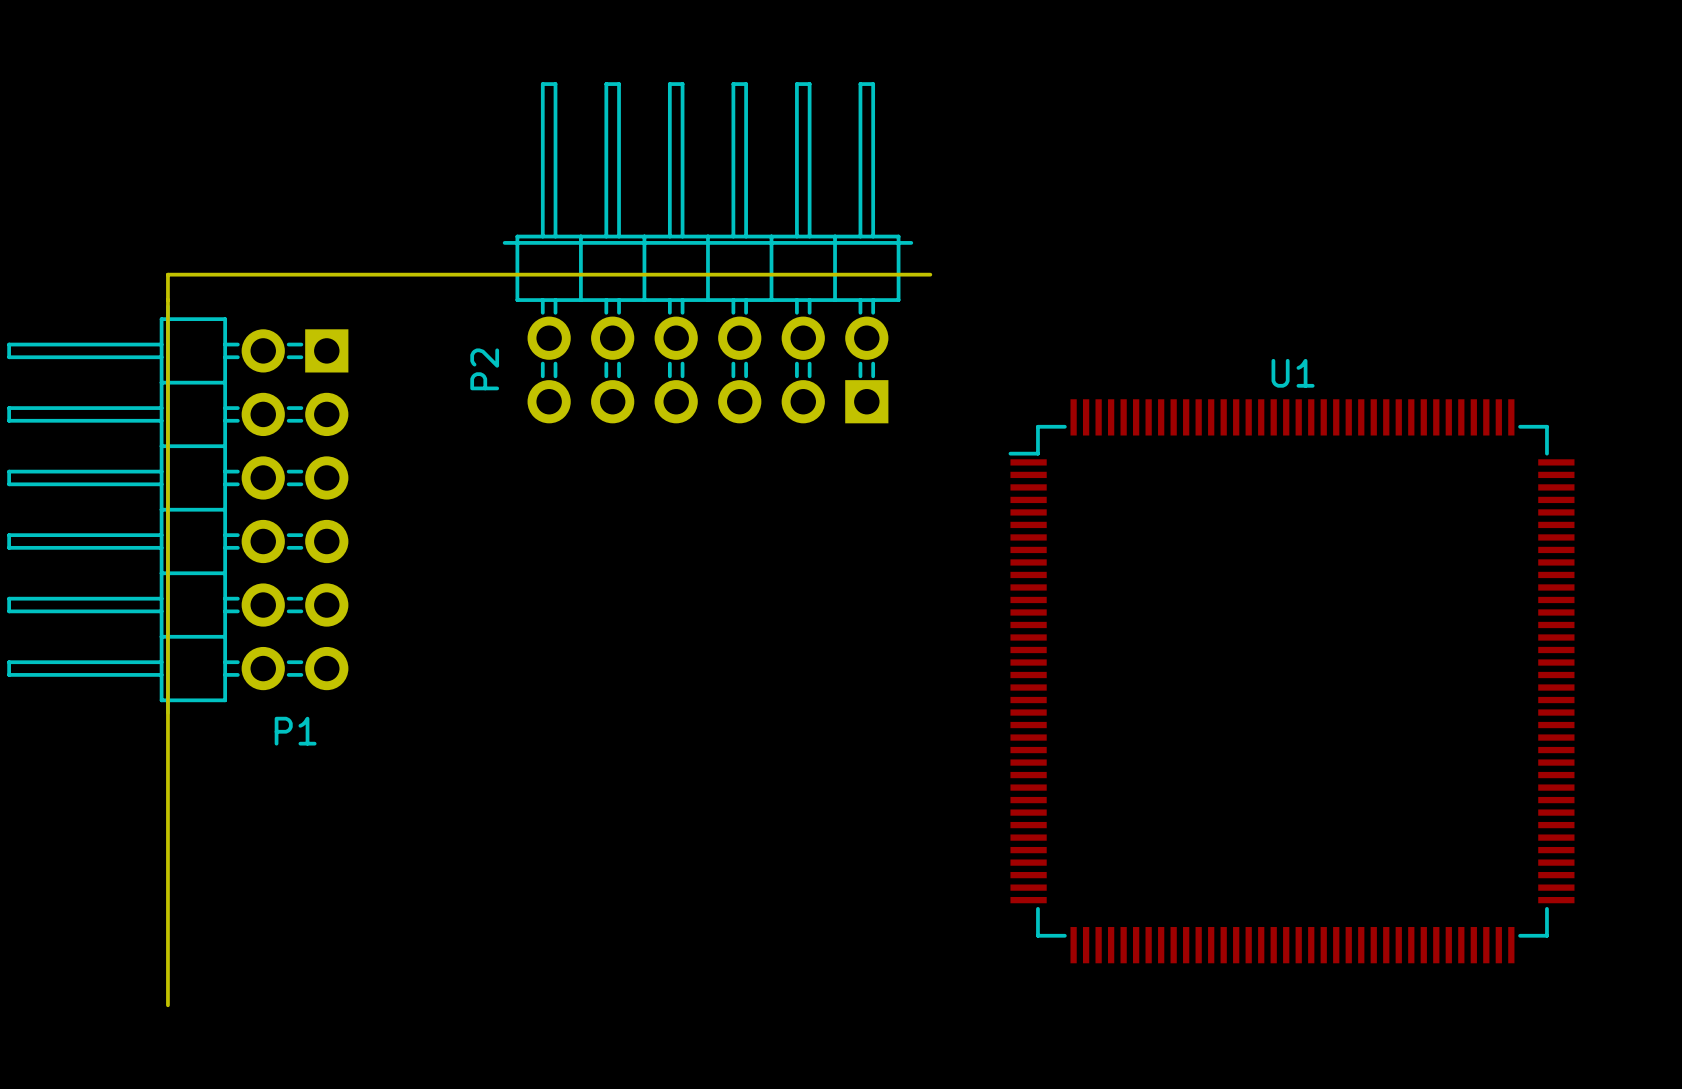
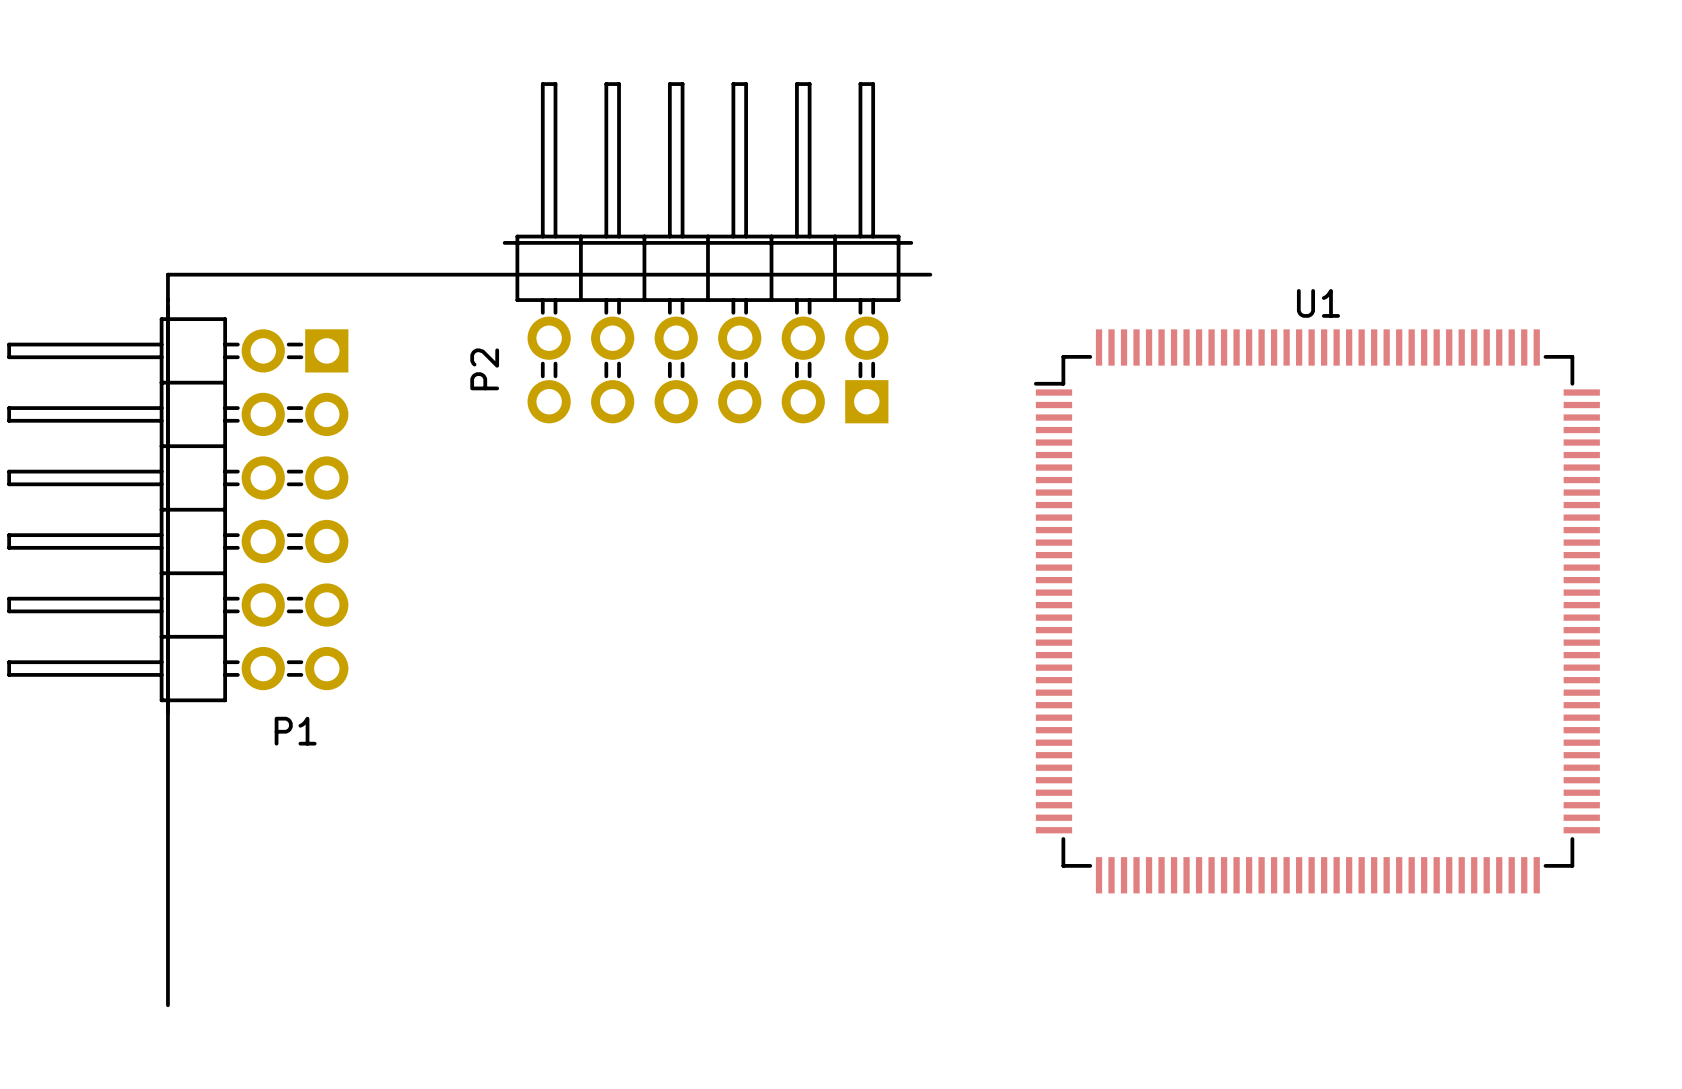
U1 position: (1291, 681) -> (1316, 611)

